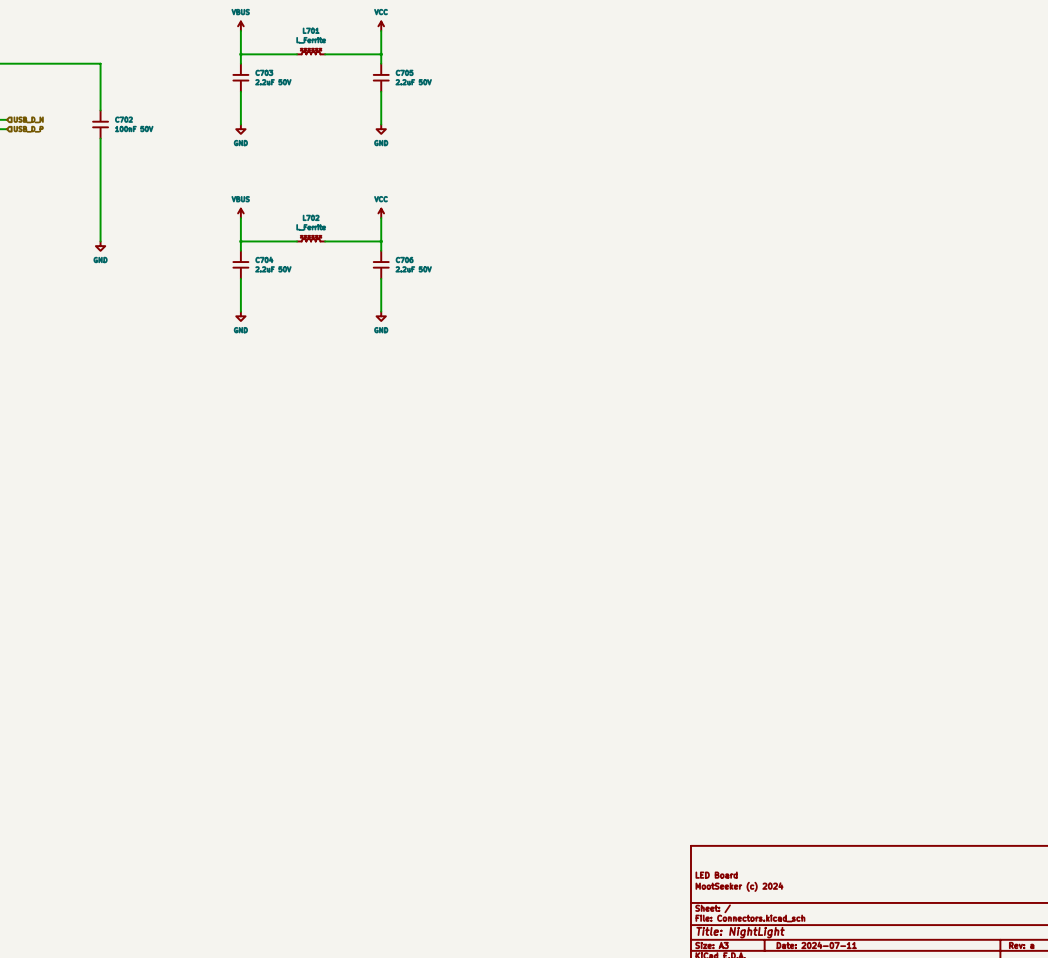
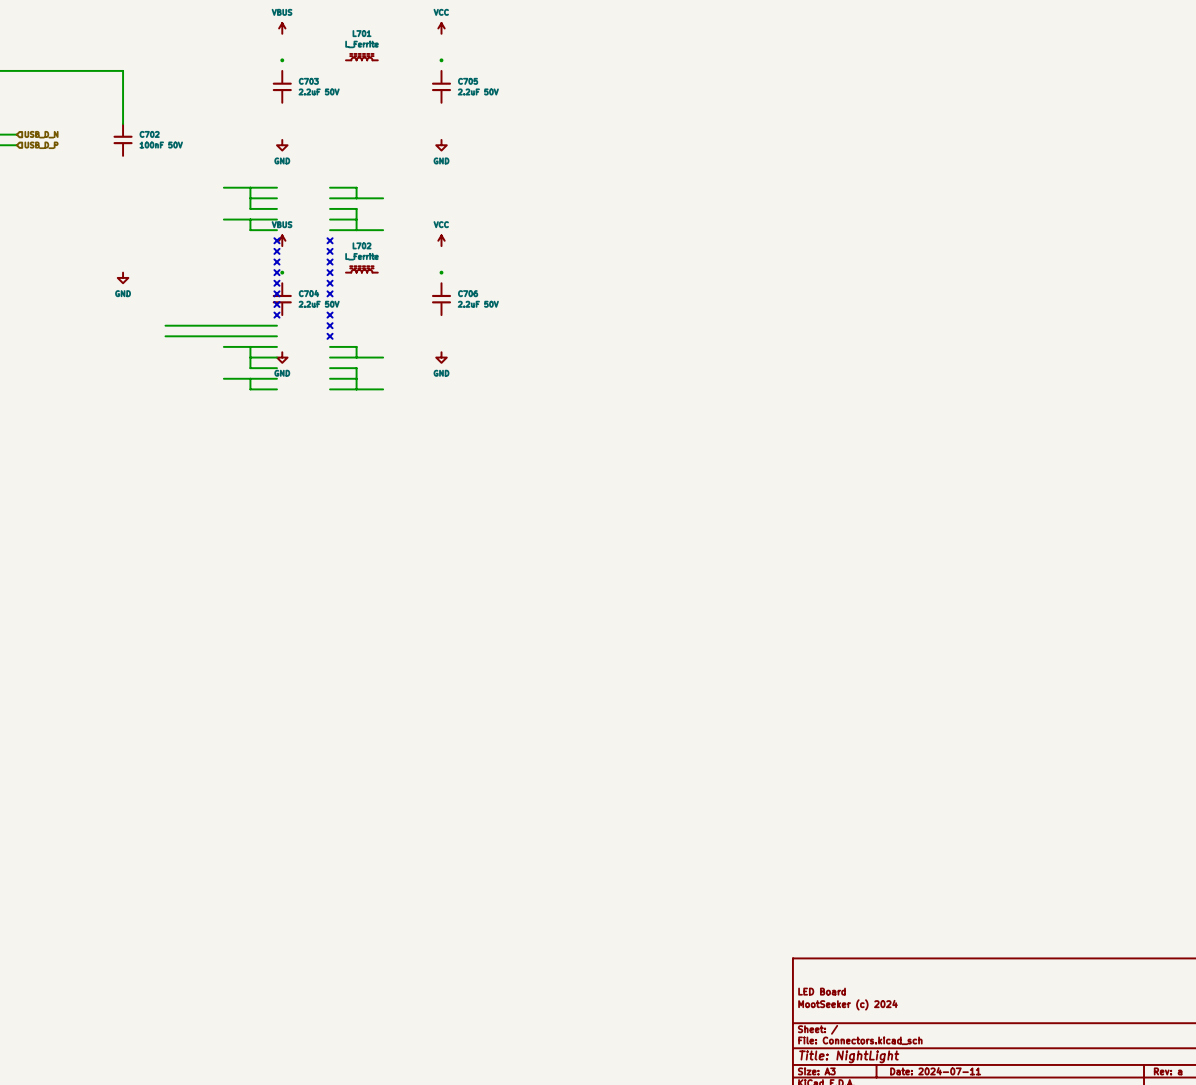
wire: (240, 30) (240, 63) -> none
wire: (381, 30) (381, 63) -> none
wire: (240, 54) (297, 54) -> none
wire: (325, 54) (381, 54) -> none
wire: (240, 91) (240, 124) -> none
wire: (381, 91) (381, 124) -> none
wire: (100, 138) (100, 241) -> none
wire: none -> (223, 187) (276, 187)
wire: none -> (250, 187) (250, 208) (276, 208)
wire: none -> (330, 187) (356, 187) (356, 198)
wire: none -> (250, 198) (276, 198)
wire: none -> (330, 198) (383, 198)
wire: none -> (330, 208) (356, 208) (356, 230)
wire: none -> (223, 219) (276, 219)
wire: none -> (250, 219) (250, 230) (276, 230)
wire: none -> (330, 219) (356, 219)
wire: none -> (330, 230) (383, 230)
no-connect mark: none -> (276, 240)
no-connect mark: none -> (330, 240)
wire: (240, 218) (240, 250) -> none
wire: (381, 218) (381, 250) -> none
no-connect mark: none -> (276, 251)
no-connect mark: none -> (330, 251)
no-connect mark: none -> (276, 262)
no-connect mark: none -> (330, 262)
no-connect mark: none -> (276, 272)
wire: (240, 241) (297, 241) -> none
no-connect mark: none -> (330, 272)
wire: (325, 241) (381, 241) -> none
no-connect mark: none -> (276, 283)
no-connect mark: none -> (330, 283)
no-connect mark: none -> (276, 293)
no-connect mark: none -> (330, 293)
no-connect mark: none -> (276, 304)
no-connect mark: none -> (276, 315)
wire: (240, 278) (240, 311) -> none
no-connect mark: none -> (330, 315)
wire: (381, 278) (381, 311) -> none
wire: none -> (165, 325) (276, 325)
no-connect mark: none -> (330, 325)
wire: none -> (165, 336) (276, 336)
no-connect mark: none -> (330, 336)
wire: none -> (223, 346) (276, 346)
wire: none -> (250, 346) (250, 368) (276, 368)
wire: none -> (330, 346) (356, 346) (356, 357)
wire: none -> (250, 357) (276, 357)
wire: none -> (330, 357) (383, 357)
wire: none -> (330, 368) (356, 368) (356, 389)
wire: none -> (223, 378) (276, 378)
wire: none -> (250, 378) (250, 389) (276, 389)
wire: none -> (330, 378) (356, 378)
wire: none -> (330, 389) (383, 389)

